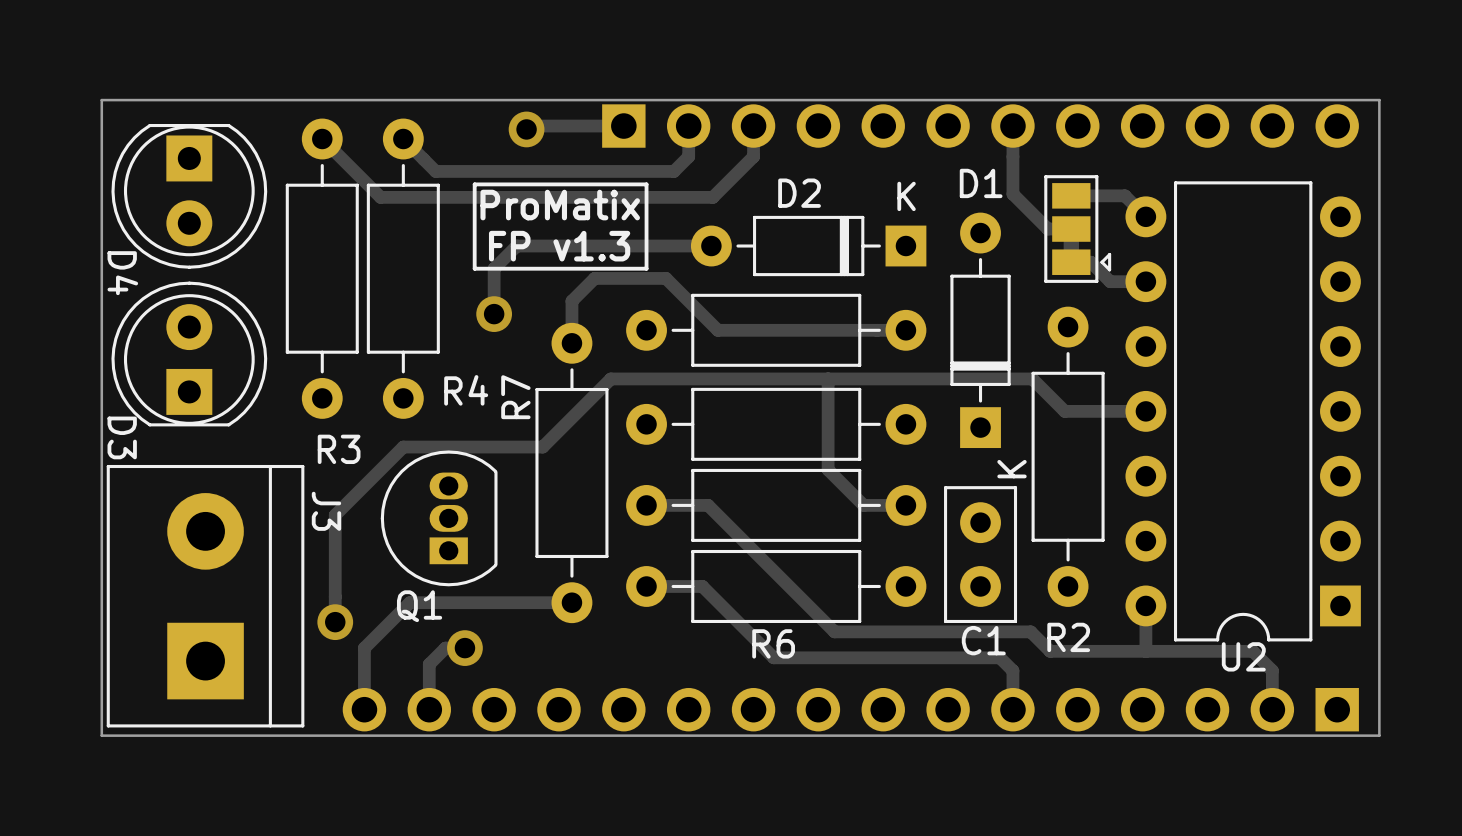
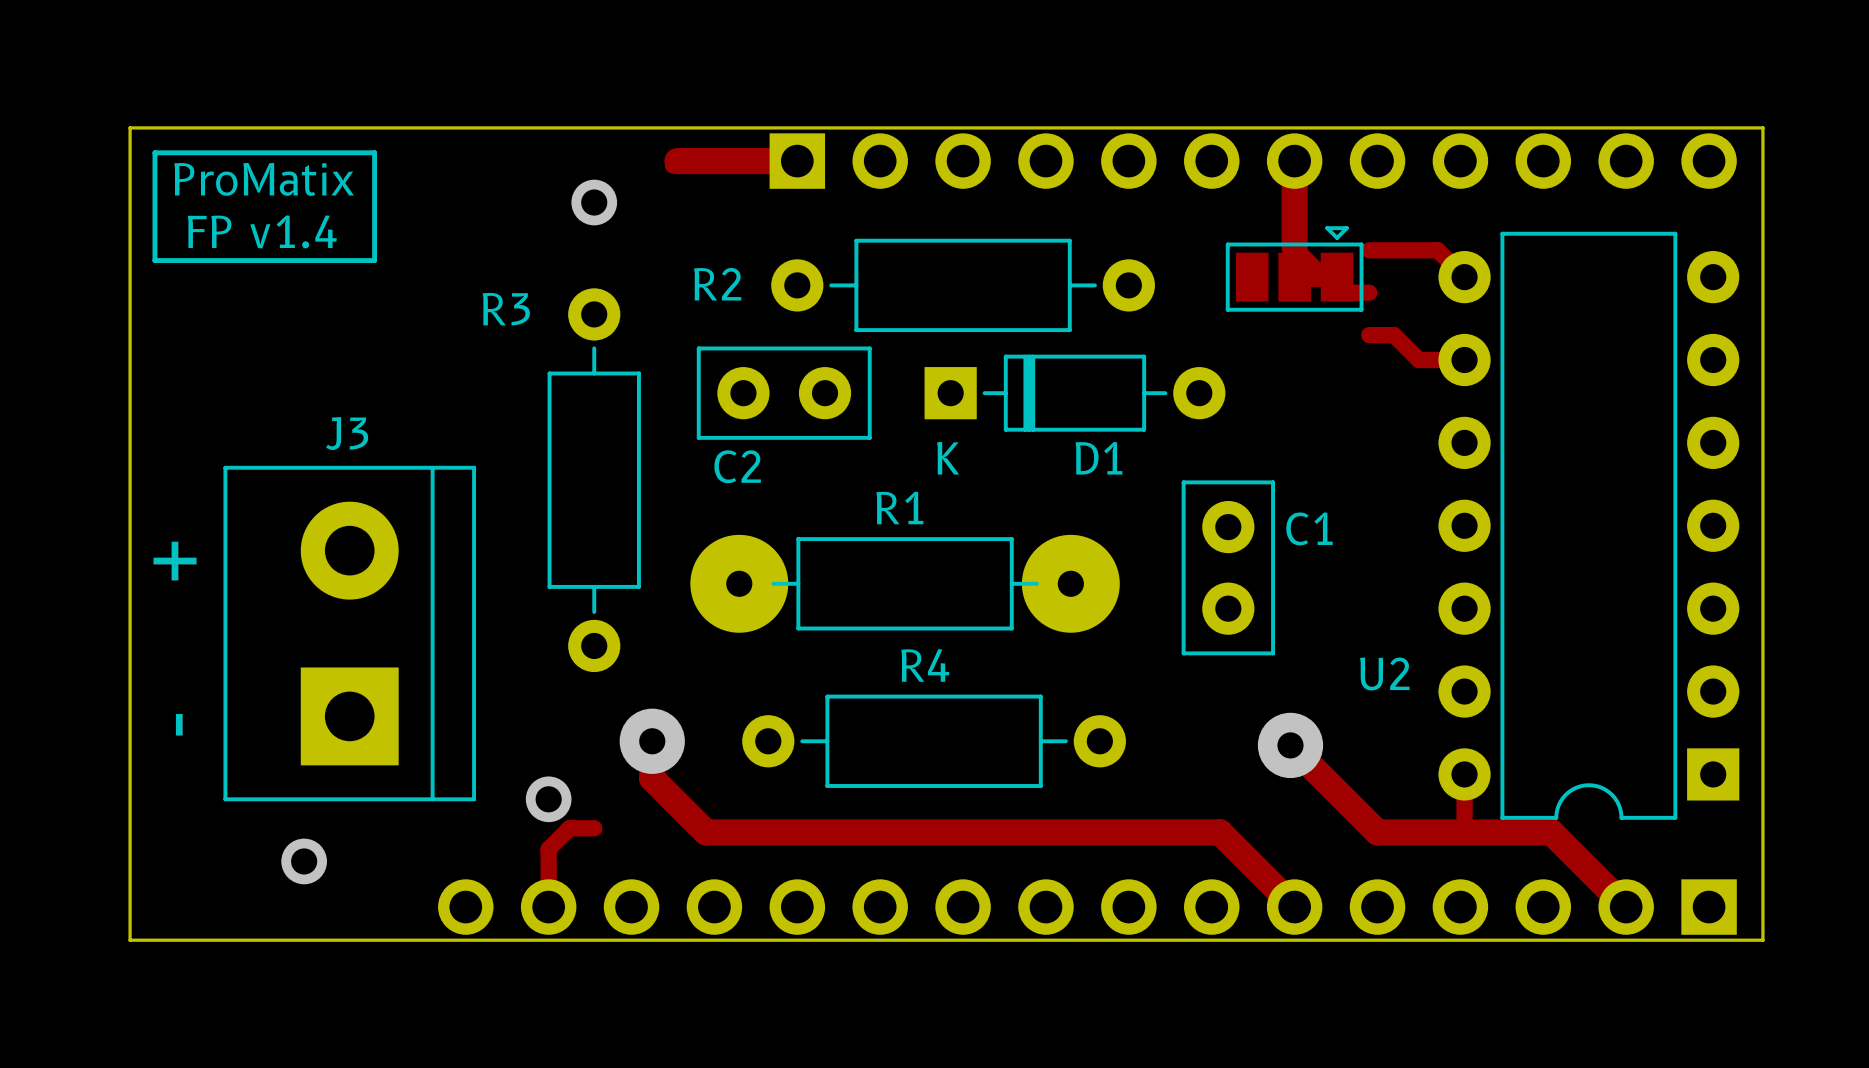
track width: thin (529, 126) (623, 126) -> thick (677, 161) (797, 161)
track: (688, 126) (688, 156) (673, 171) (435, 171) (403, 139) -> none
track: (753, 126) (753, 156) (712, 197) (380, 197) (322, 139) -> none
track width: thin (1012, 126) (1012, 194) -> thick (1294, 161) (1294, 248)
via position: (526, 129) -> (594, 202)
text: none -> FP v1.4 (262, 231)
D1 name position: D1 (981, 183) -> D1 (1098, 458)
line: (474, 184) (474, 268) (646, 268) (646, 184) (474, 184) -> (154, 152) (154, 260) (374, 260) (374, 152) (154, 152)
D4: (189, 196) -> none
text position: ProMatix (560, 205) -> ProMatix (264, 179)
D1 footprint: [950, 212, 1011, 449] -> [924, 354, 1226, 432]
part rotation: 0° (1077, 229) -> 90° counterclockwise (1294, 268)
part position: (1077, 229) -> (1294, 268)
text: FP v1.3 (559, 246) -> none
track: (711, 246) (516, 246) (494, 268) (494, 314) -> none
D2: (808, 246) -> none
R3 position: (322, 268) -> (594, 480)
R4 rotation: 0° (403, 268) -> 90° clockwise (934, 741)
R4 position: (403, 268) -> (934, 741)
C2: none -> (784, 393)
via: (494, 314) -> none
part: (776, 330) -> none
track: (905, 330) (717, 330) (665, 278) (594, 278) (571, 301) (571, 343) -> none
D3: (189, 354) -> none
track: (828, 378) (828, 469) (863, 505) (905, 505) -> none
R4 name position: R4 (466, 390) -> R4 (925, 665)
track: (1145, 411) (1064, 411) (1032, 378) (610, 378) (542, 447) (403, 447) (335, 515) (335, 622) -> none
part: (776, 424) -> none
text: none -> + (175, 561)
R3 name position: R3 (339, 449) -> R3 (506, 309)
R1: none -> (905, 583)
R2 rotation: 0° (1068, 456) -> 90° clockwise (963, 285)
R2 position: (1068, 456) -> (963, 285)
R7: (571, 472) -> none
track: (646, 505) (708, 505) (834, 631) (1030, 631) (1050, 651) (1077, 651) -> (1290, 745) (1377, 832)
part: (776, 505) -> none
J3 name rotation: 0° (326, 511) -> 90° counterclockwise (347, 433)
J3 name position: J3 (326, 511) -> J3 (347, 433)
Q1: (439, 518) -> none
C1 position: (980, 554) -> (1228, 567)
text: none -> - (179, 724)
via: none -> (652, 741)
via: none -> (1290, 745)
track: (646, 586) (702, 586) (773, 657) (999, 657) (1012, 670) (1012, 709) -> (652, 741) (652, 778) (706, 832) (1220, 832) (1294, 907)
R6: (776, 586) -> none
J3 position: (205, 596) -> (349, 633)
track: (571, 602) (409, 602) (364, 648) (364, 709) -> none
via: (335, 622) -> none
C1 name position: C1 (983, 640) -> C1 (1309, 528)
via position: (464, 648) -> (548, 799)
track width: thin (1077, 651) (1214, 651) -> thick (1377, 832) (1551, 832)
track: (1214, 651) (1252, 651) (1272, 670) (1272, 709) -> (1551, 832) (1626, 907)
U2 name position: U2 (1243, 656) -> U2 (1384, 673)
via: none -> (304, 861)

